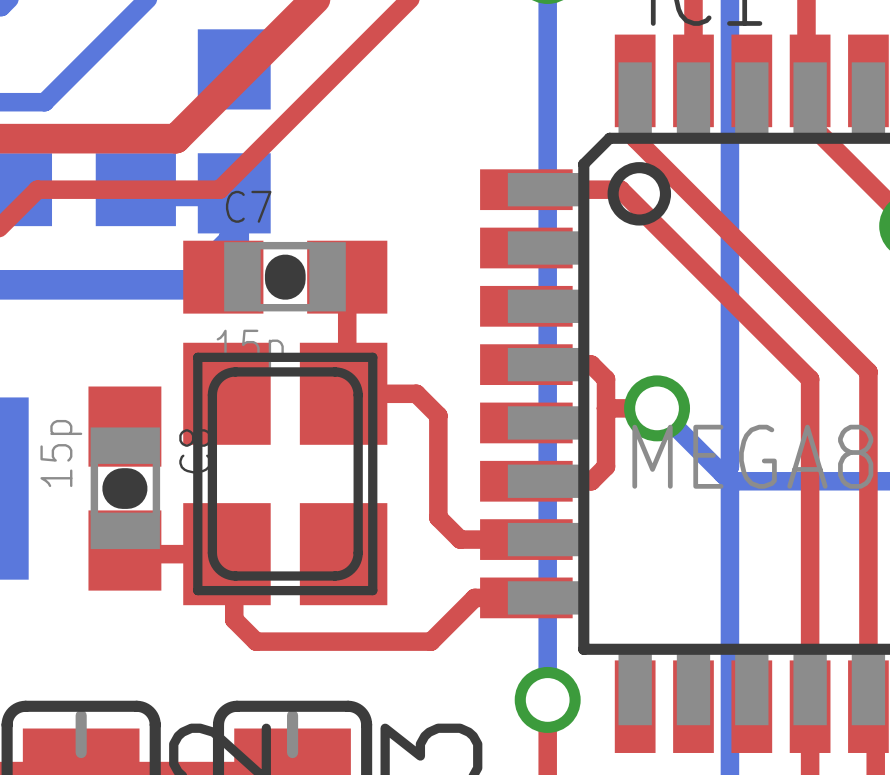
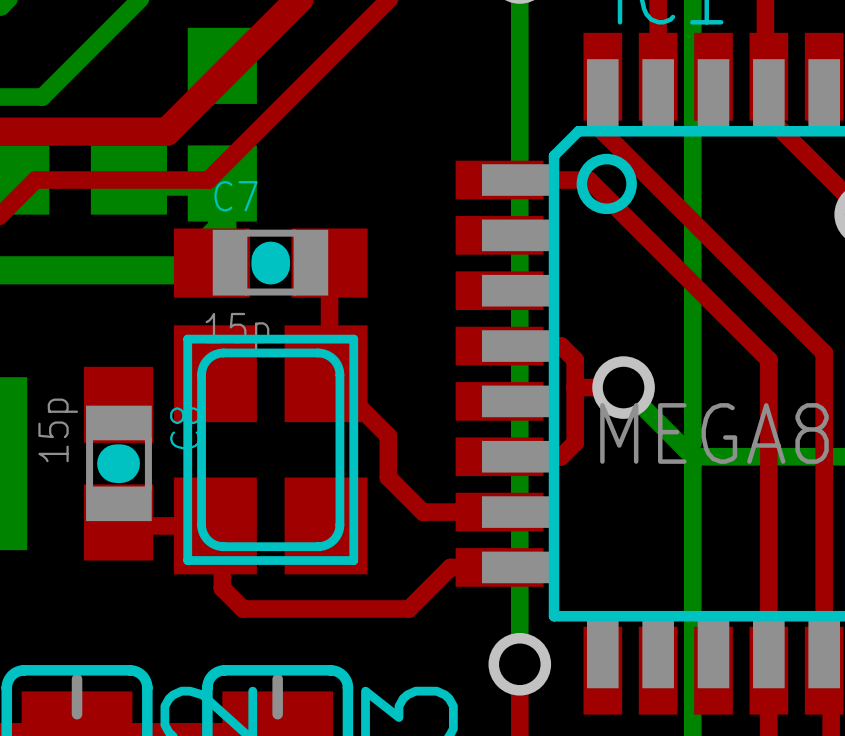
top track: (343, 393) (416, 393) (438, 415) (438, 517) (460, 539) -> (326, 373) (388, 435) (388, 477) (422, 512) (436, 512)

